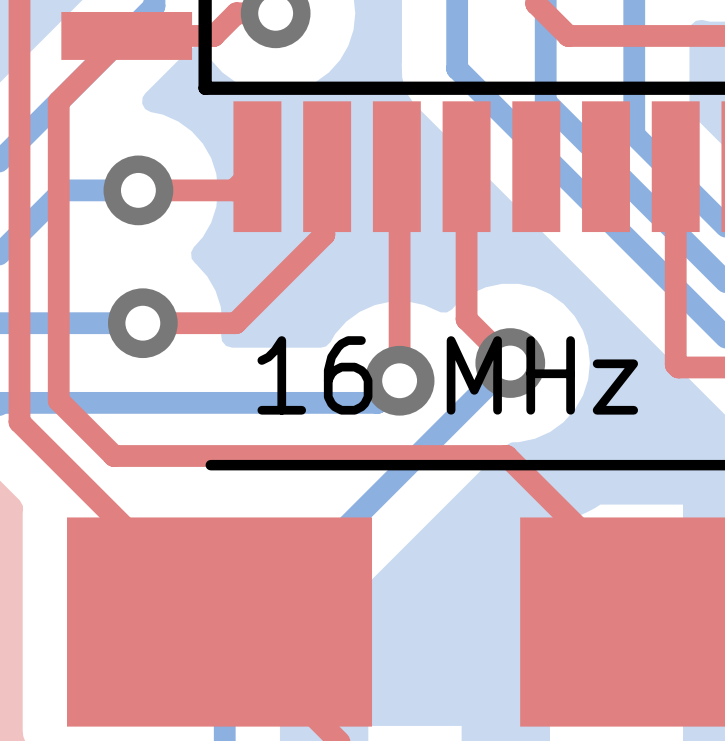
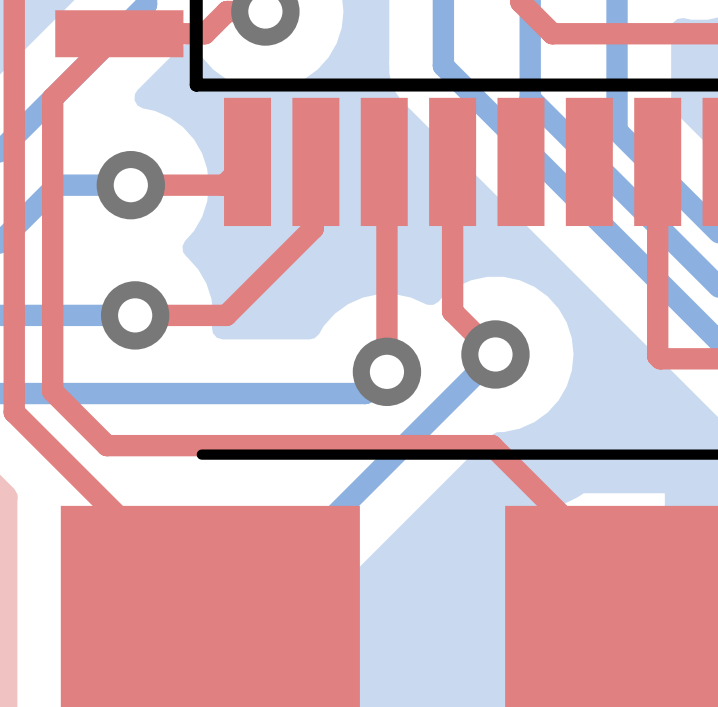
part value: 16 MHz (447, 375) -> none

